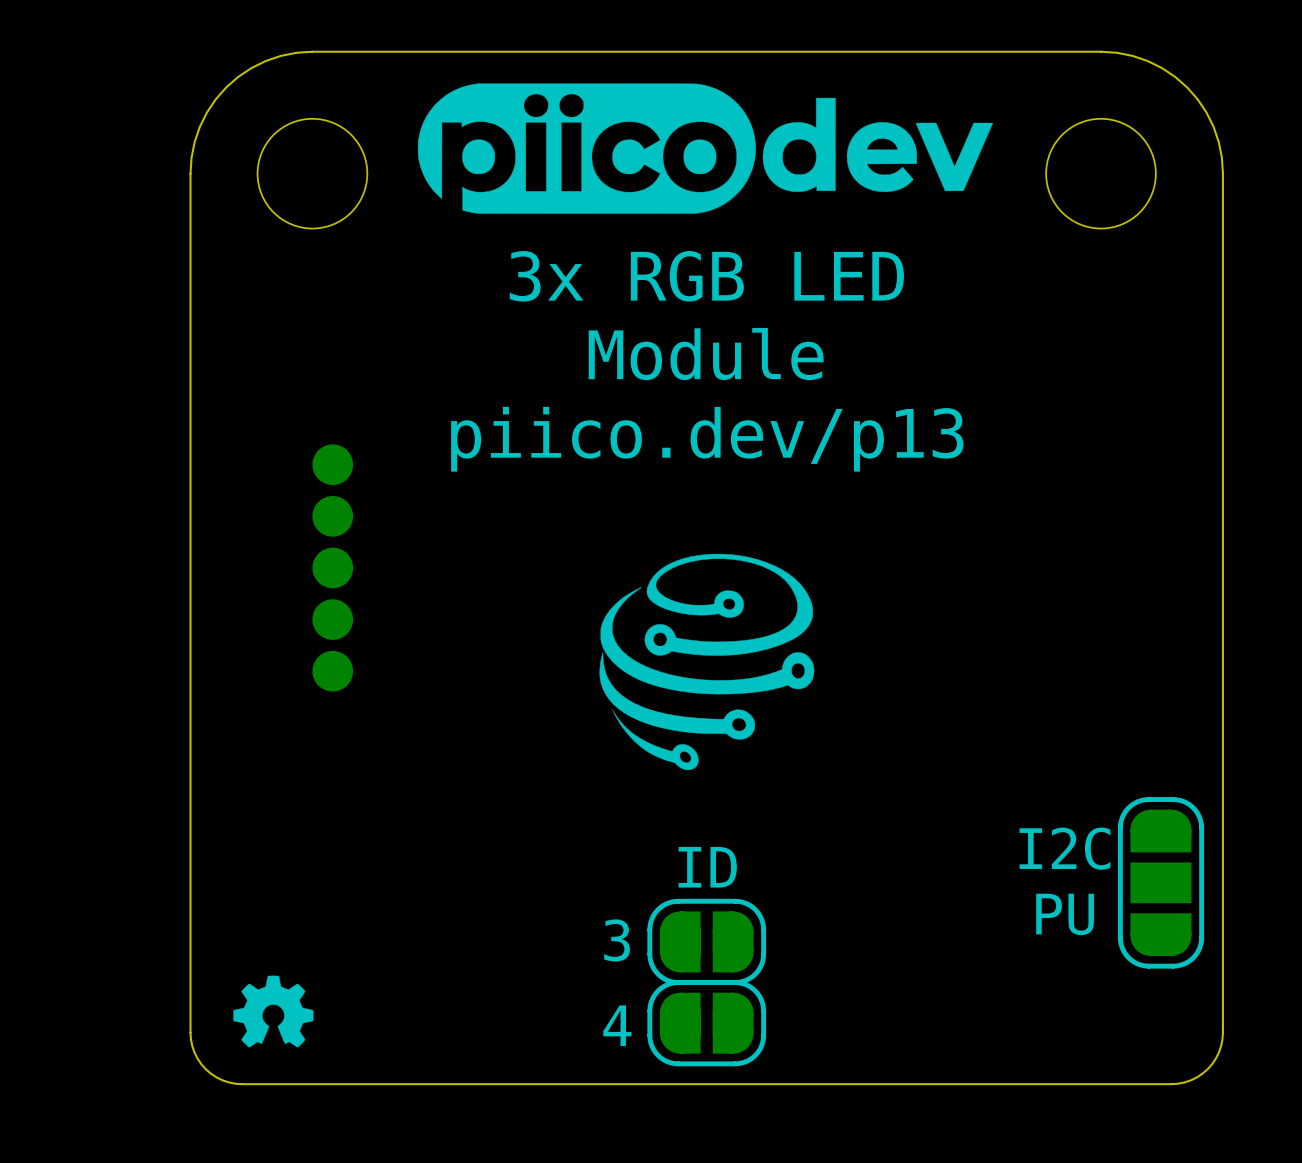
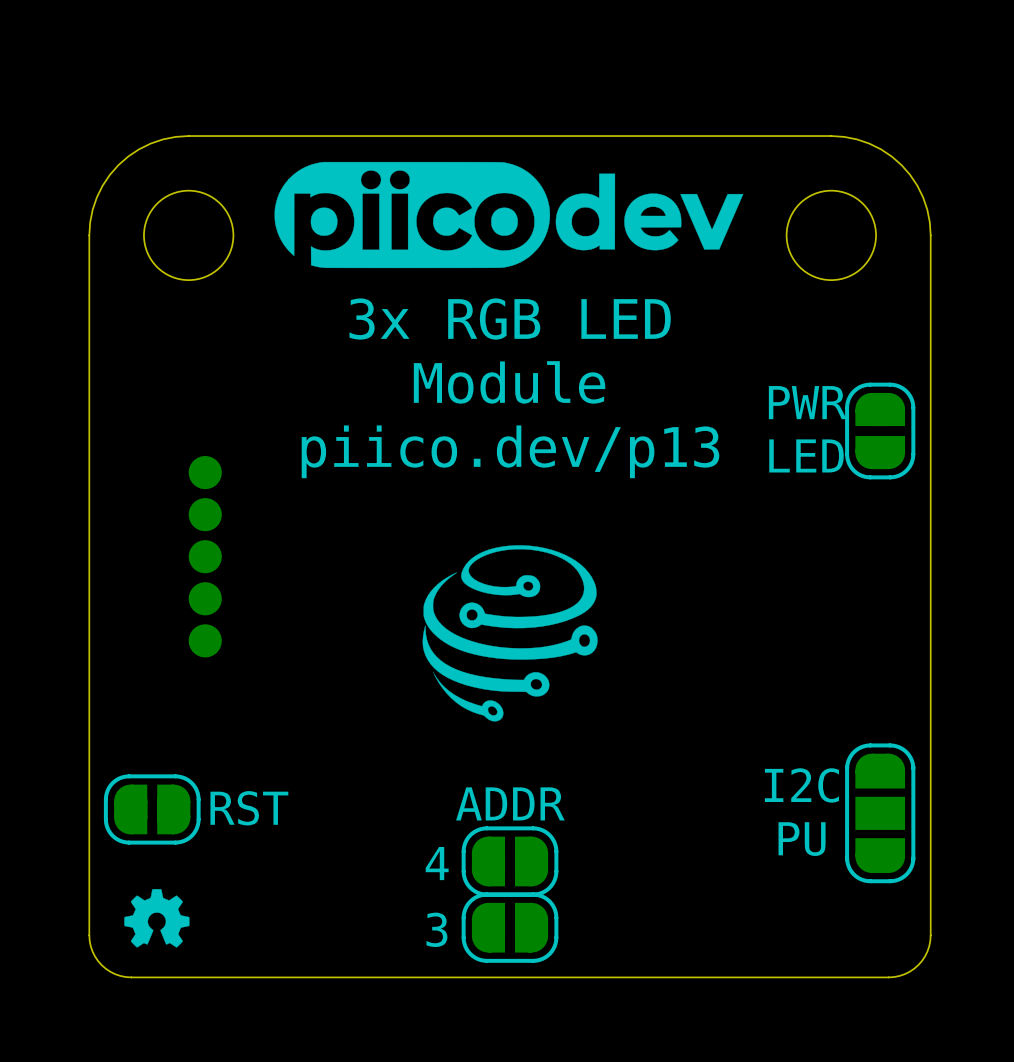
text: none -> PWR (807, 402)
part: none -> (880, 431)
text: none -> LED (806, 455)
text: ID (707, 867) -> ADDR (510, 803)
text: none -> RST (249, 808)
part: none -> (152, 809)
text: 3 (617, 940) -> 4 (437, 863)
text: 4 (617, 1025) -> 3 (436, 929)

